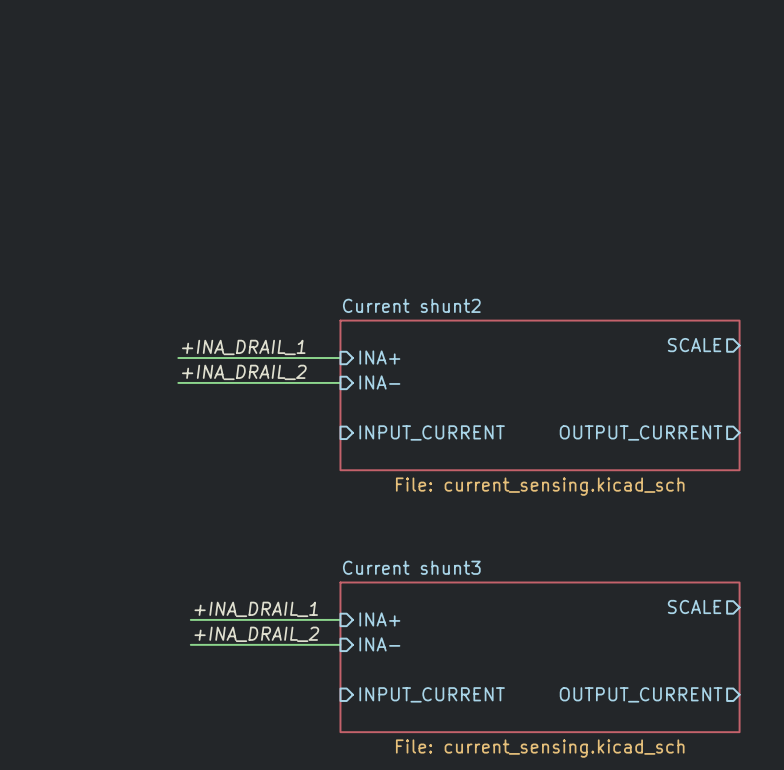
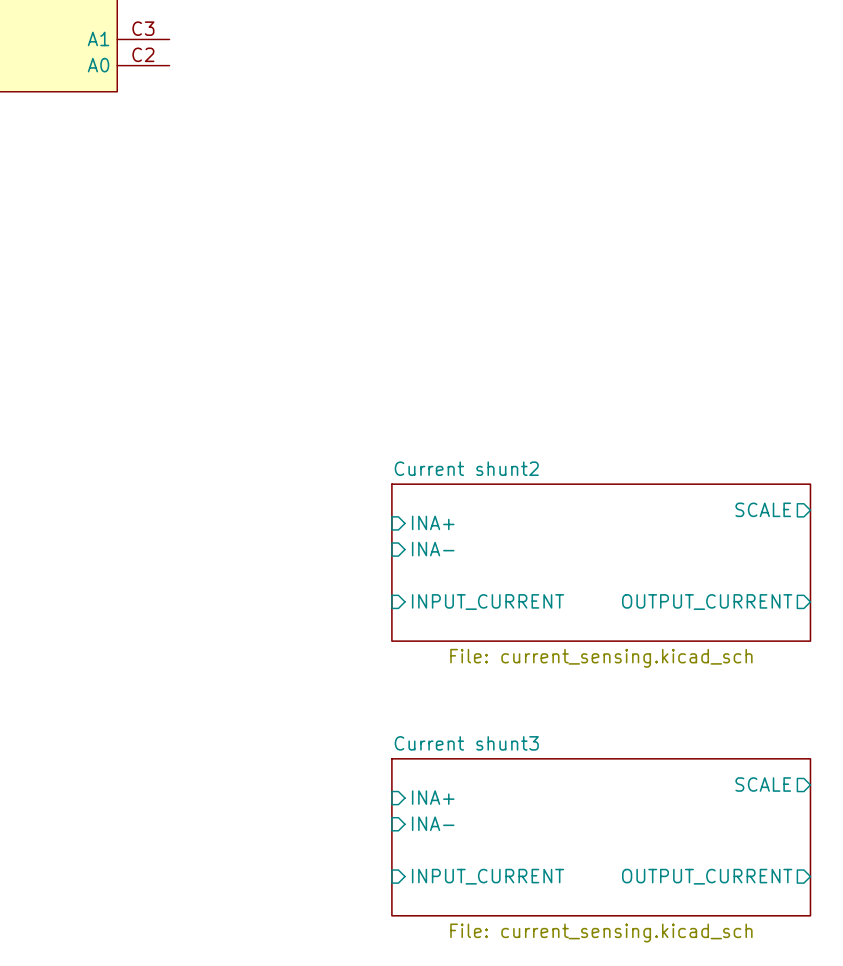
label: +INA_DRAIL_1 (243, 347) -> none
wire: (178, 358) (340, 358) -> none
label: +INA_DRAIL_2 (244, 372) -> none
wire: (178, 382) (340, 382) -> none
label: +INA_DRAIL_1 (256, 609) -> none
wire: (190, 619) (340, 619) -> none
label: +INA_DRAIL_2 (256, 634) -> none
wire: (190, 644) (340, 644) -> none

